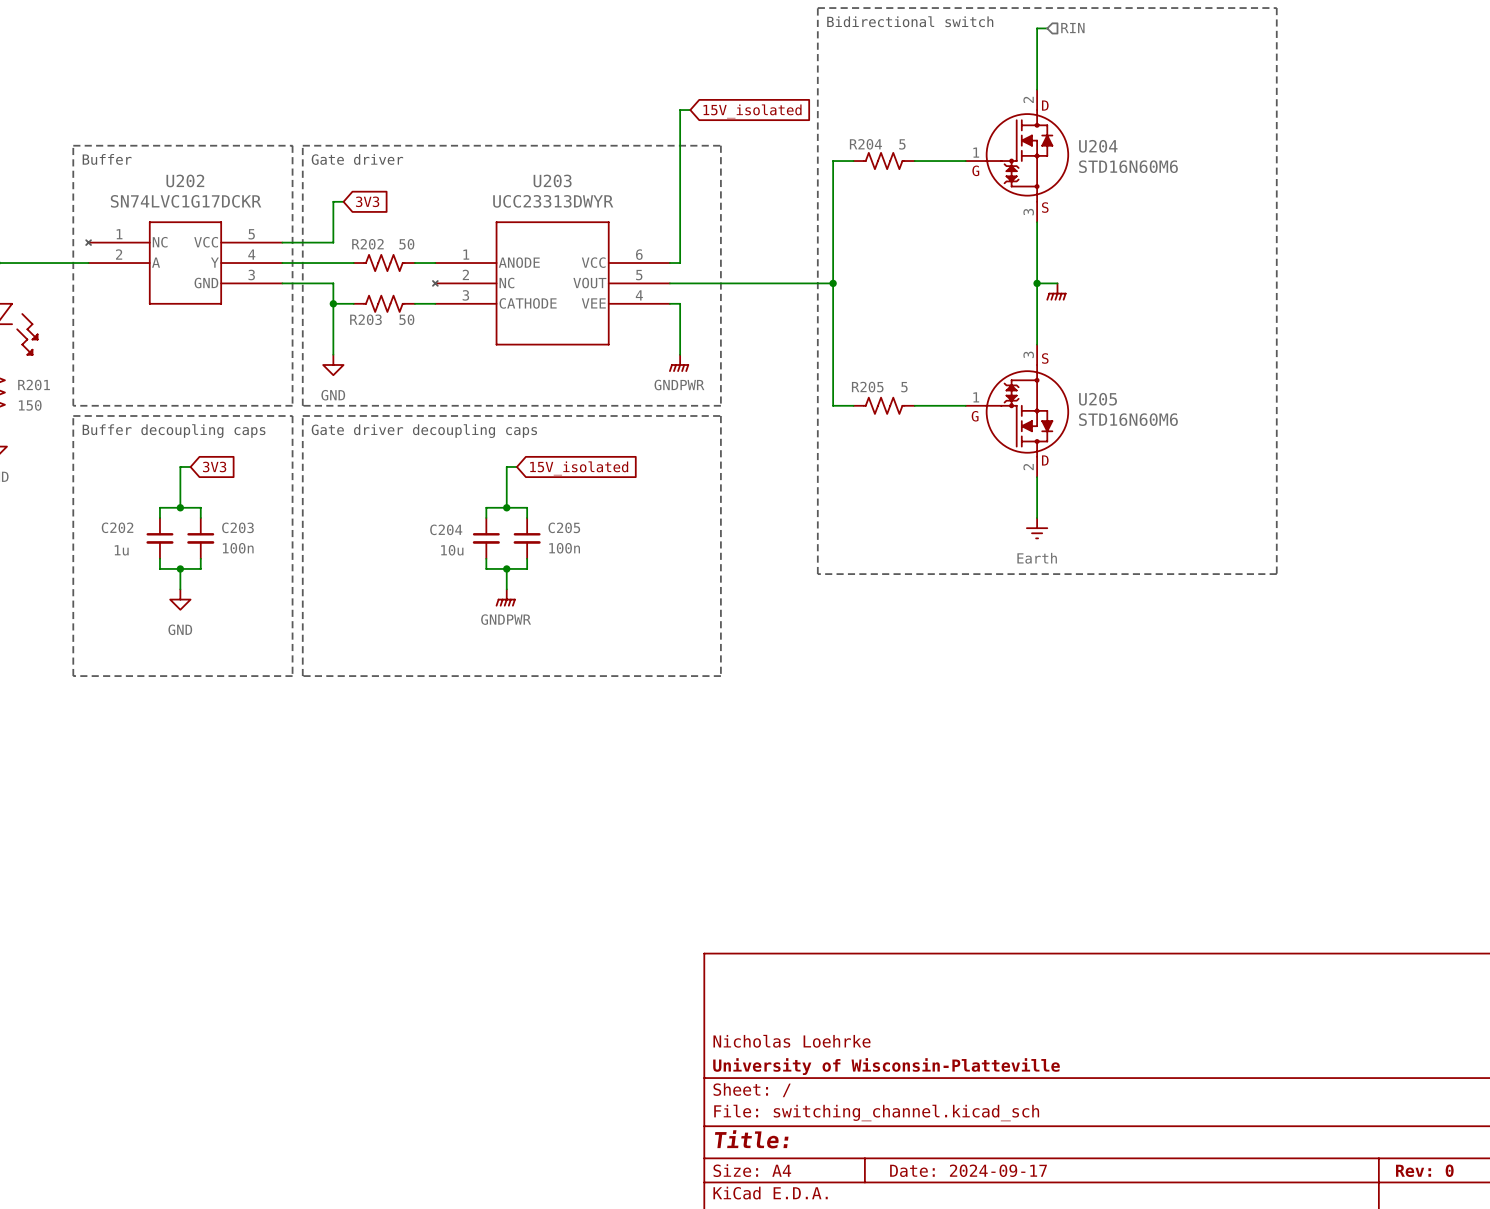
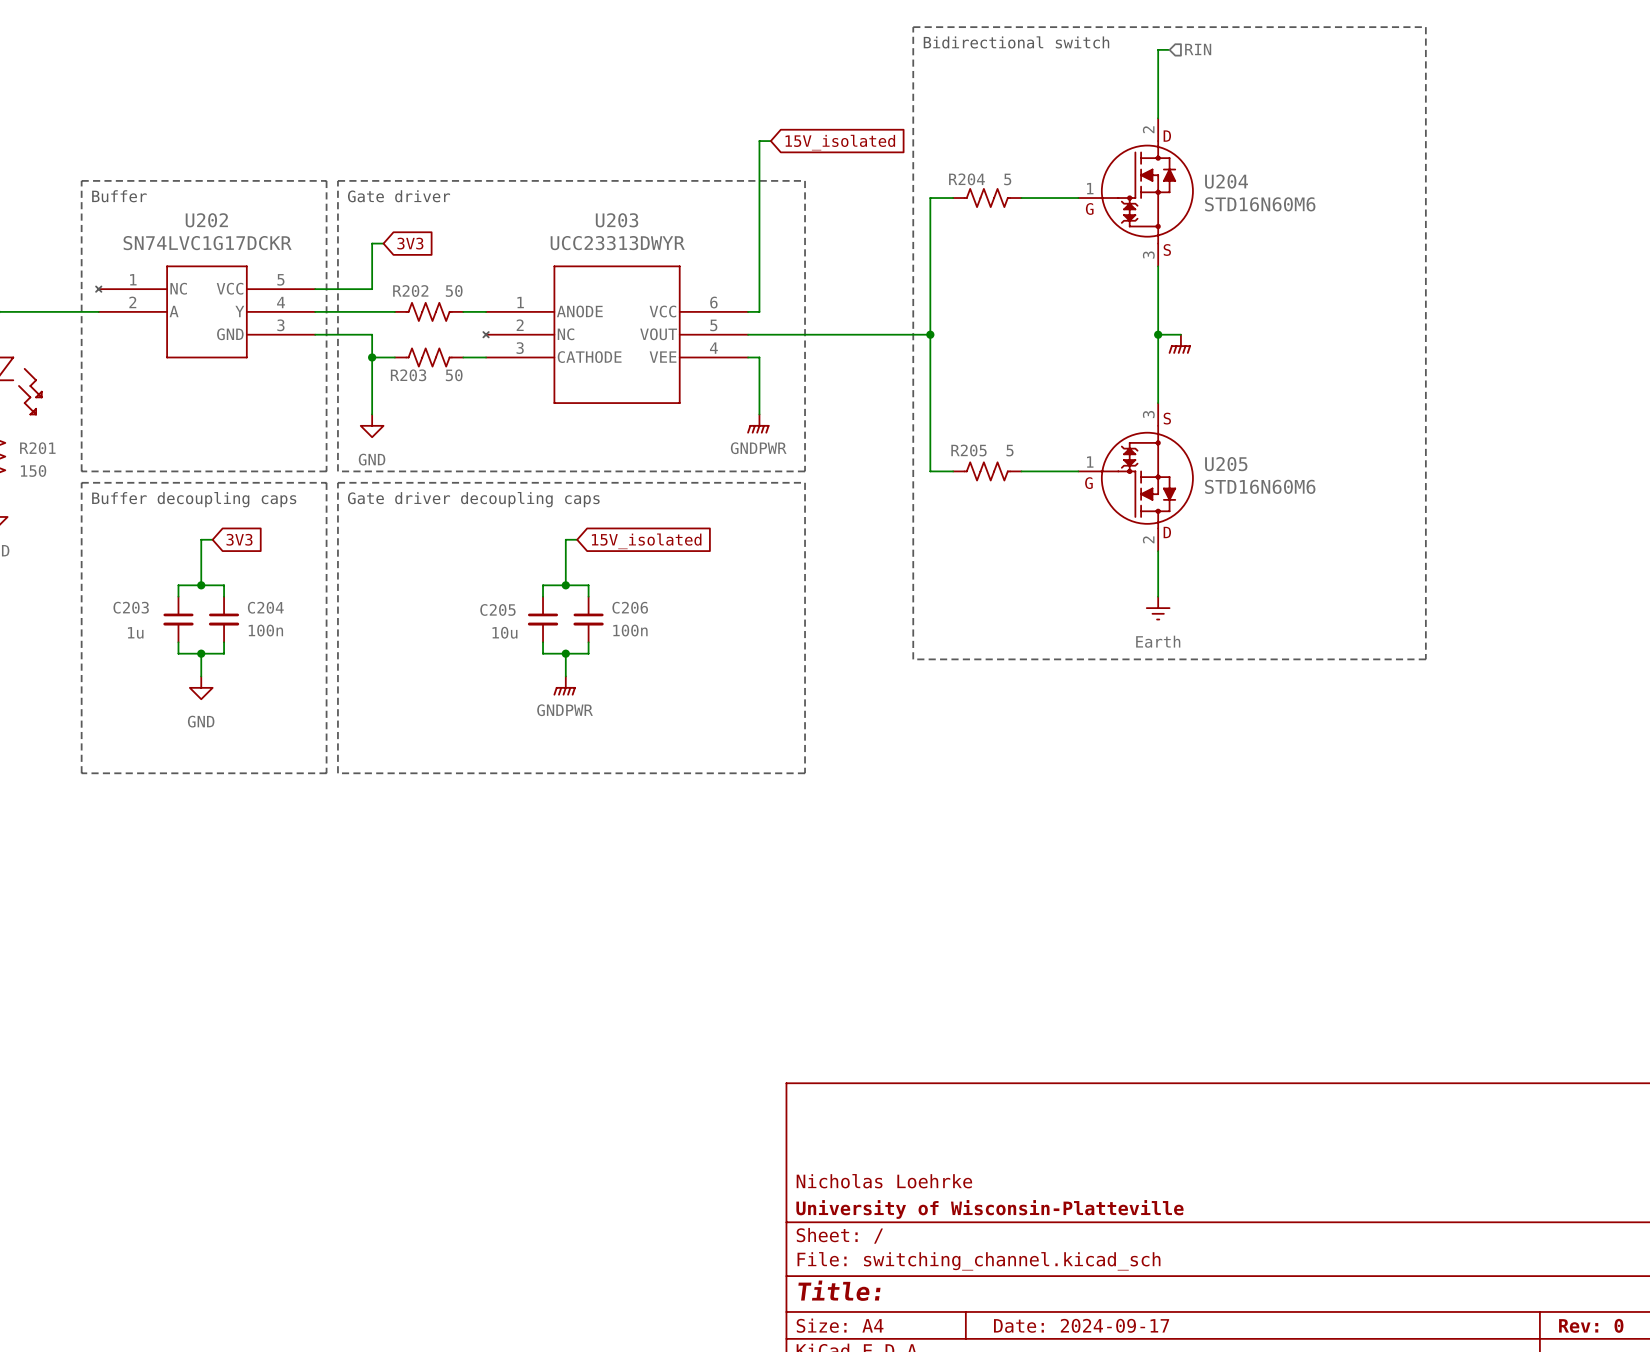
C202 name: C202 (117, 527) -> C203 (131, 607)
C203 name: C203 (237, 527) -> C204 (265, 607)
C205 name: C205 (564, 527) -> C206 (630, 607)
C204 name: C204 (446, 529) -> C205 (497, 609)

